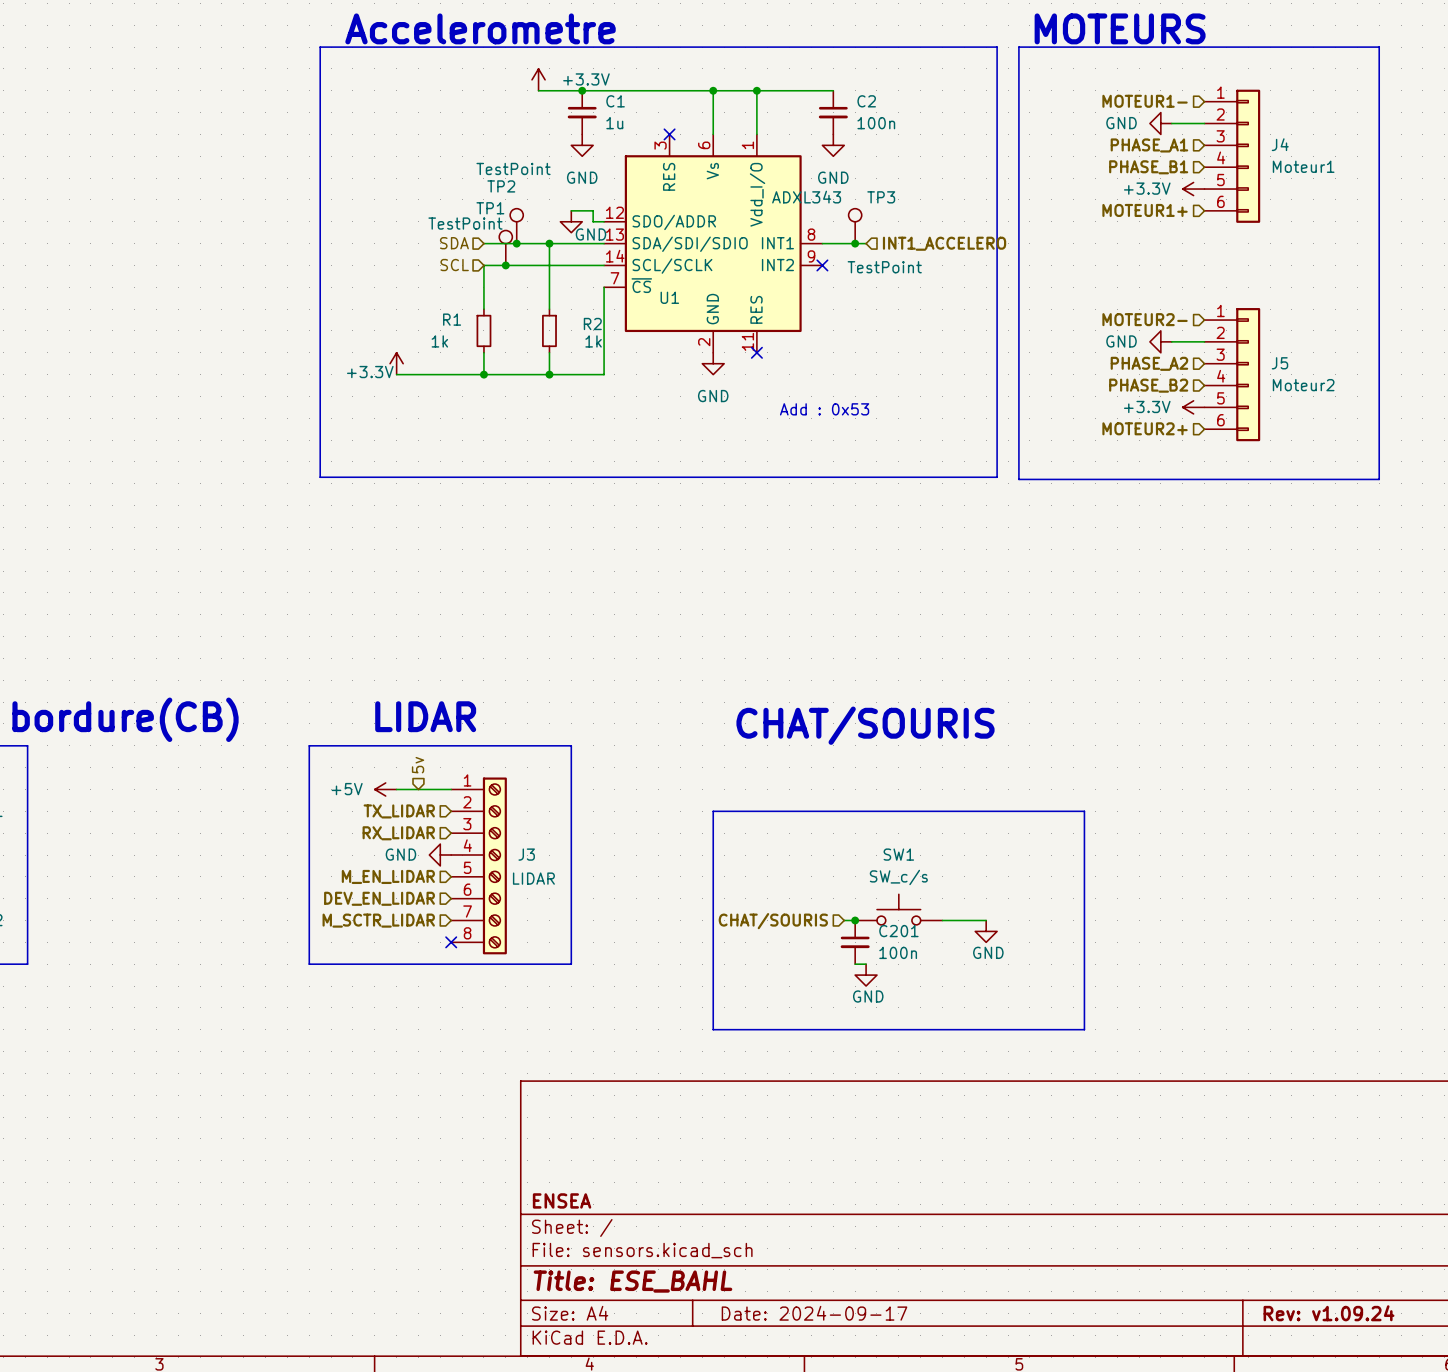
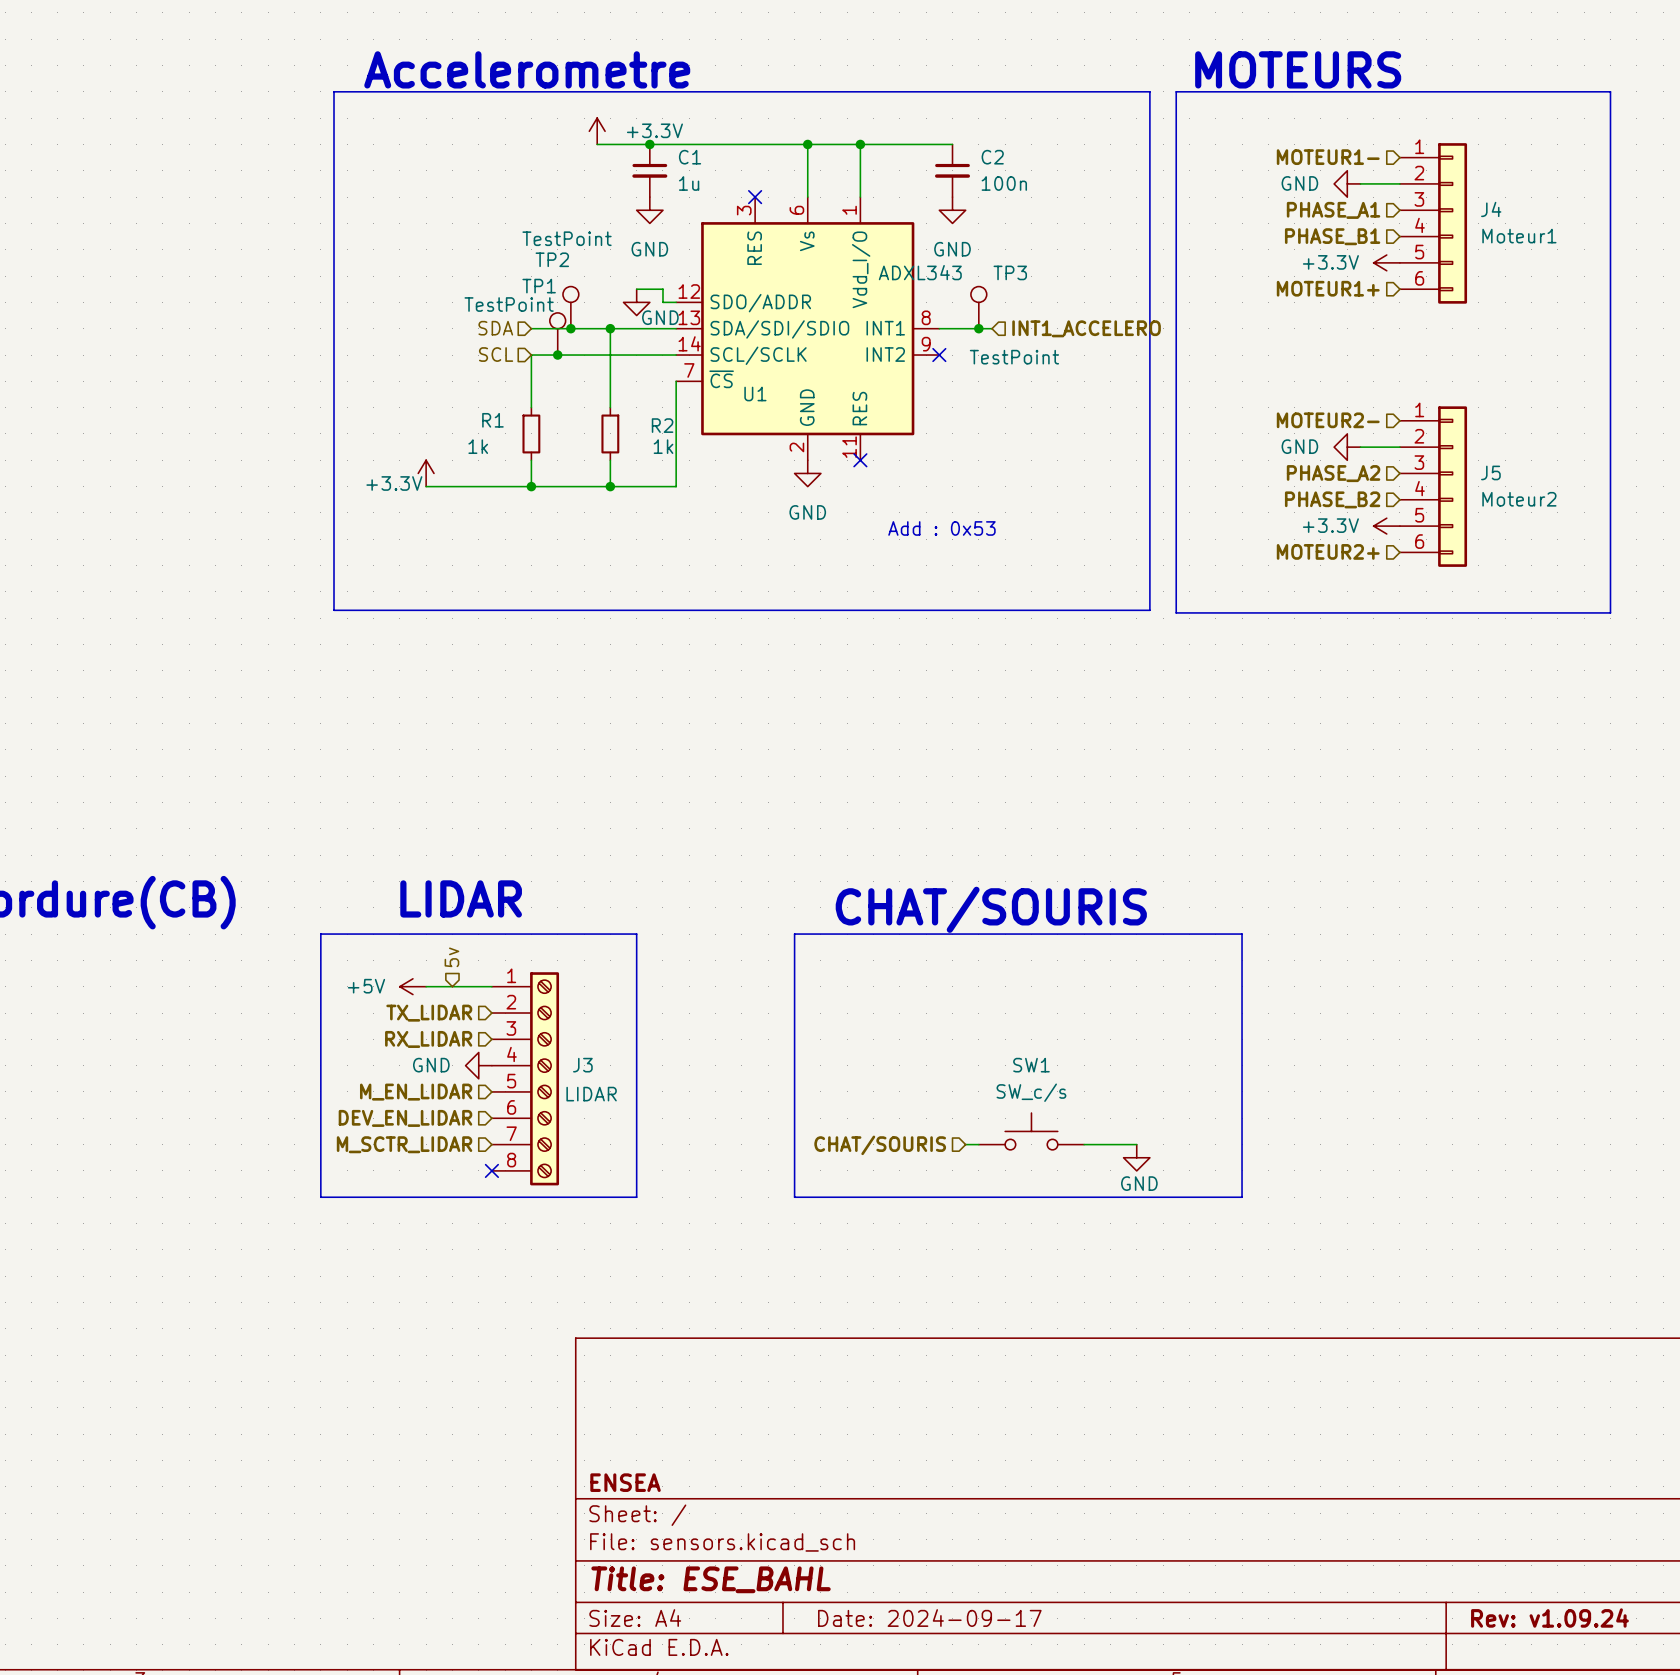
line: (713, 811) (1084, 811) (1084, 1029) (713, 1029) (713, 811) -> (794, 934) (794, 1197) (1242, 1197) (1242, 934) (794, 934)
junction: (855, 920) -> none
C201: 100n (855, 942) -> none
power symbol: GND (866, 975) -> none

